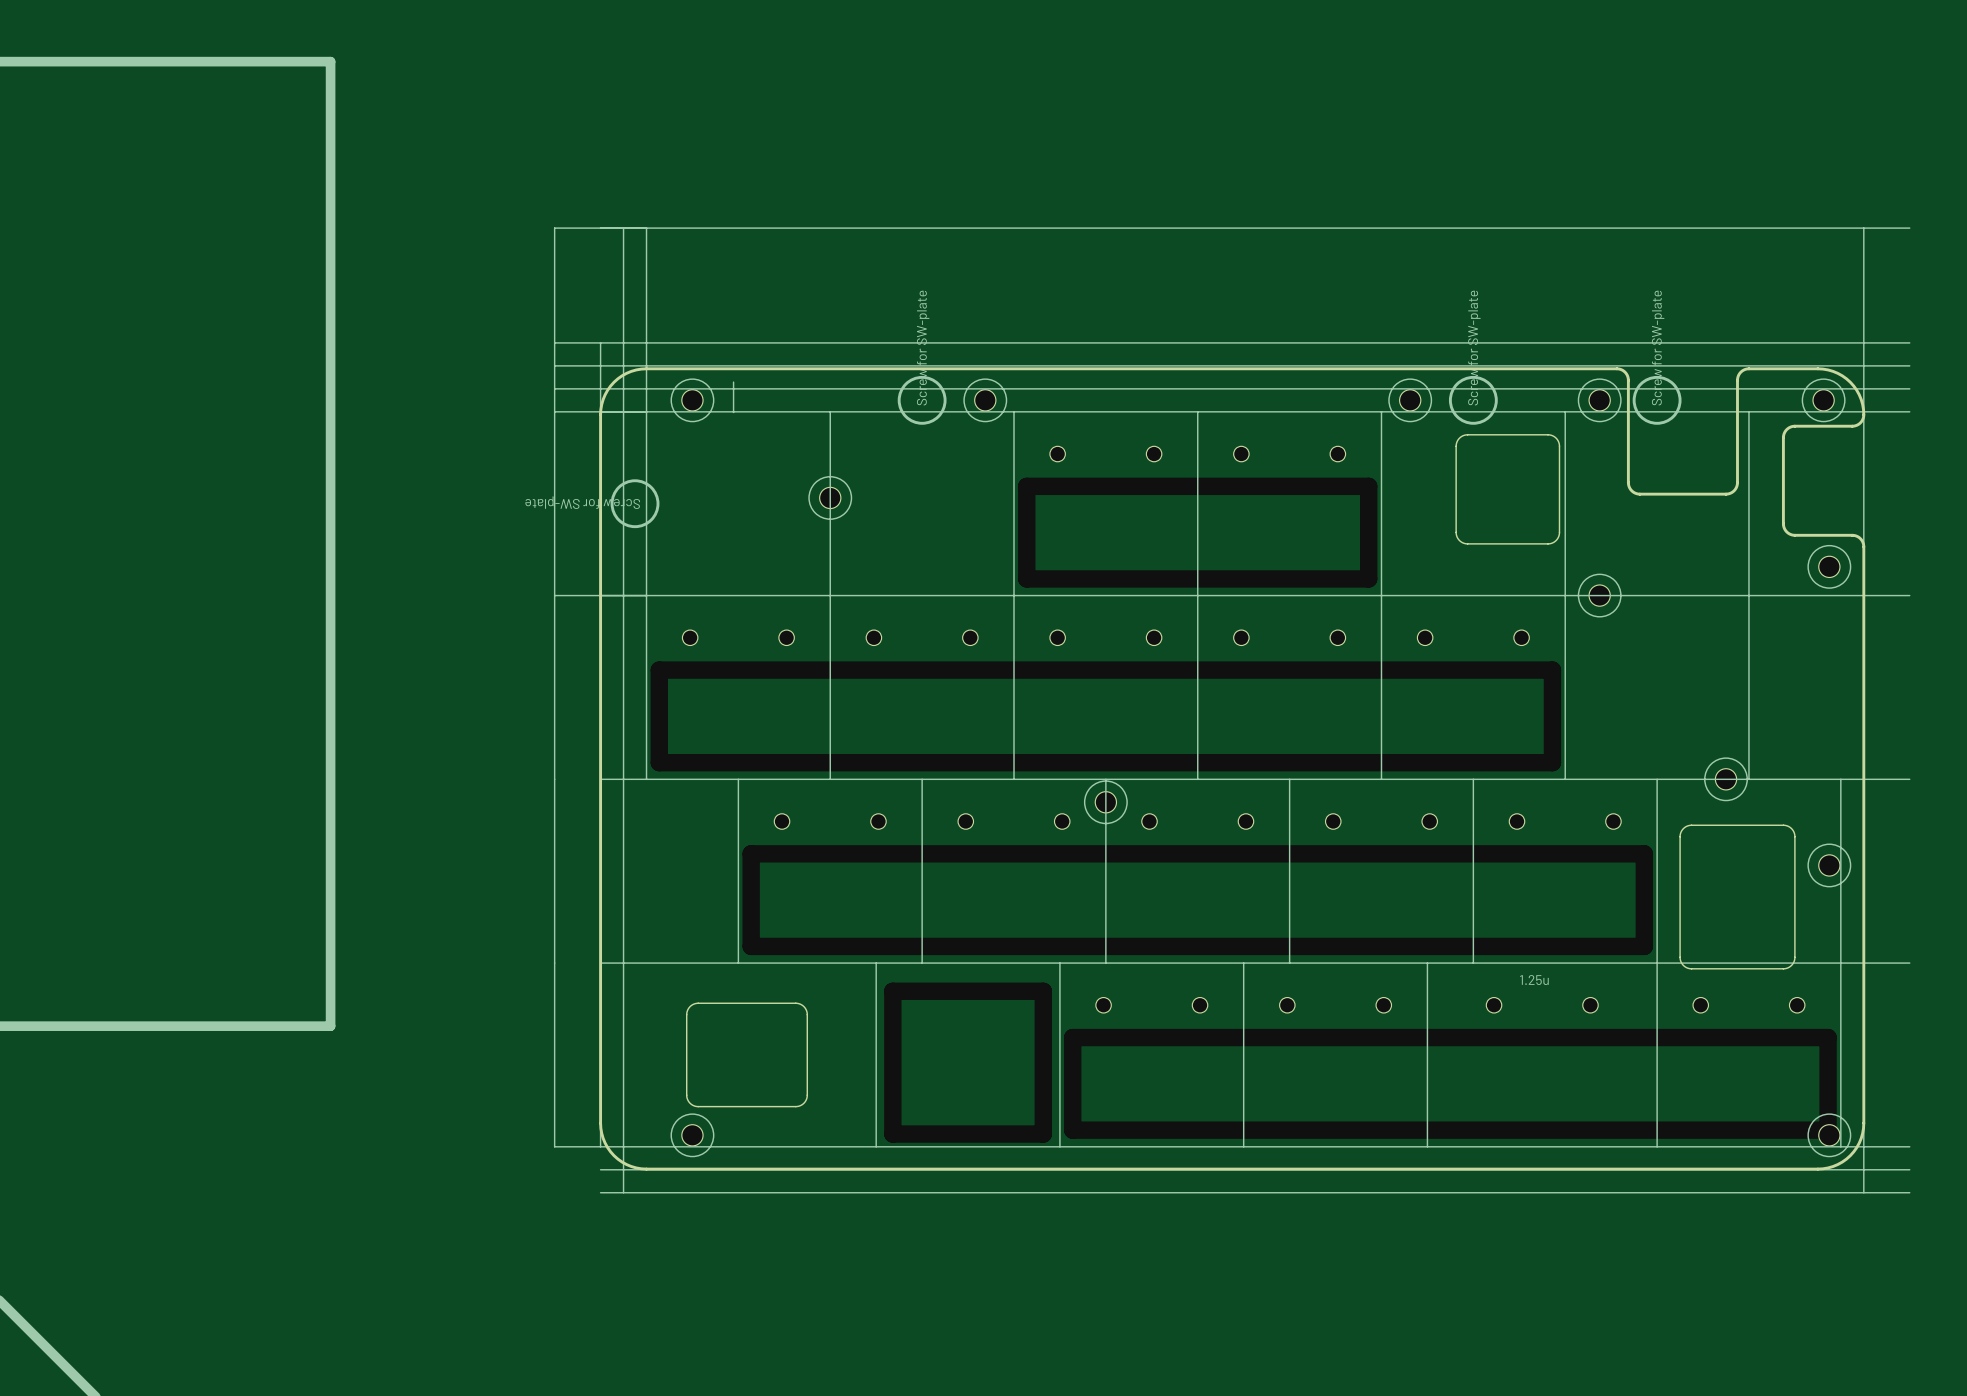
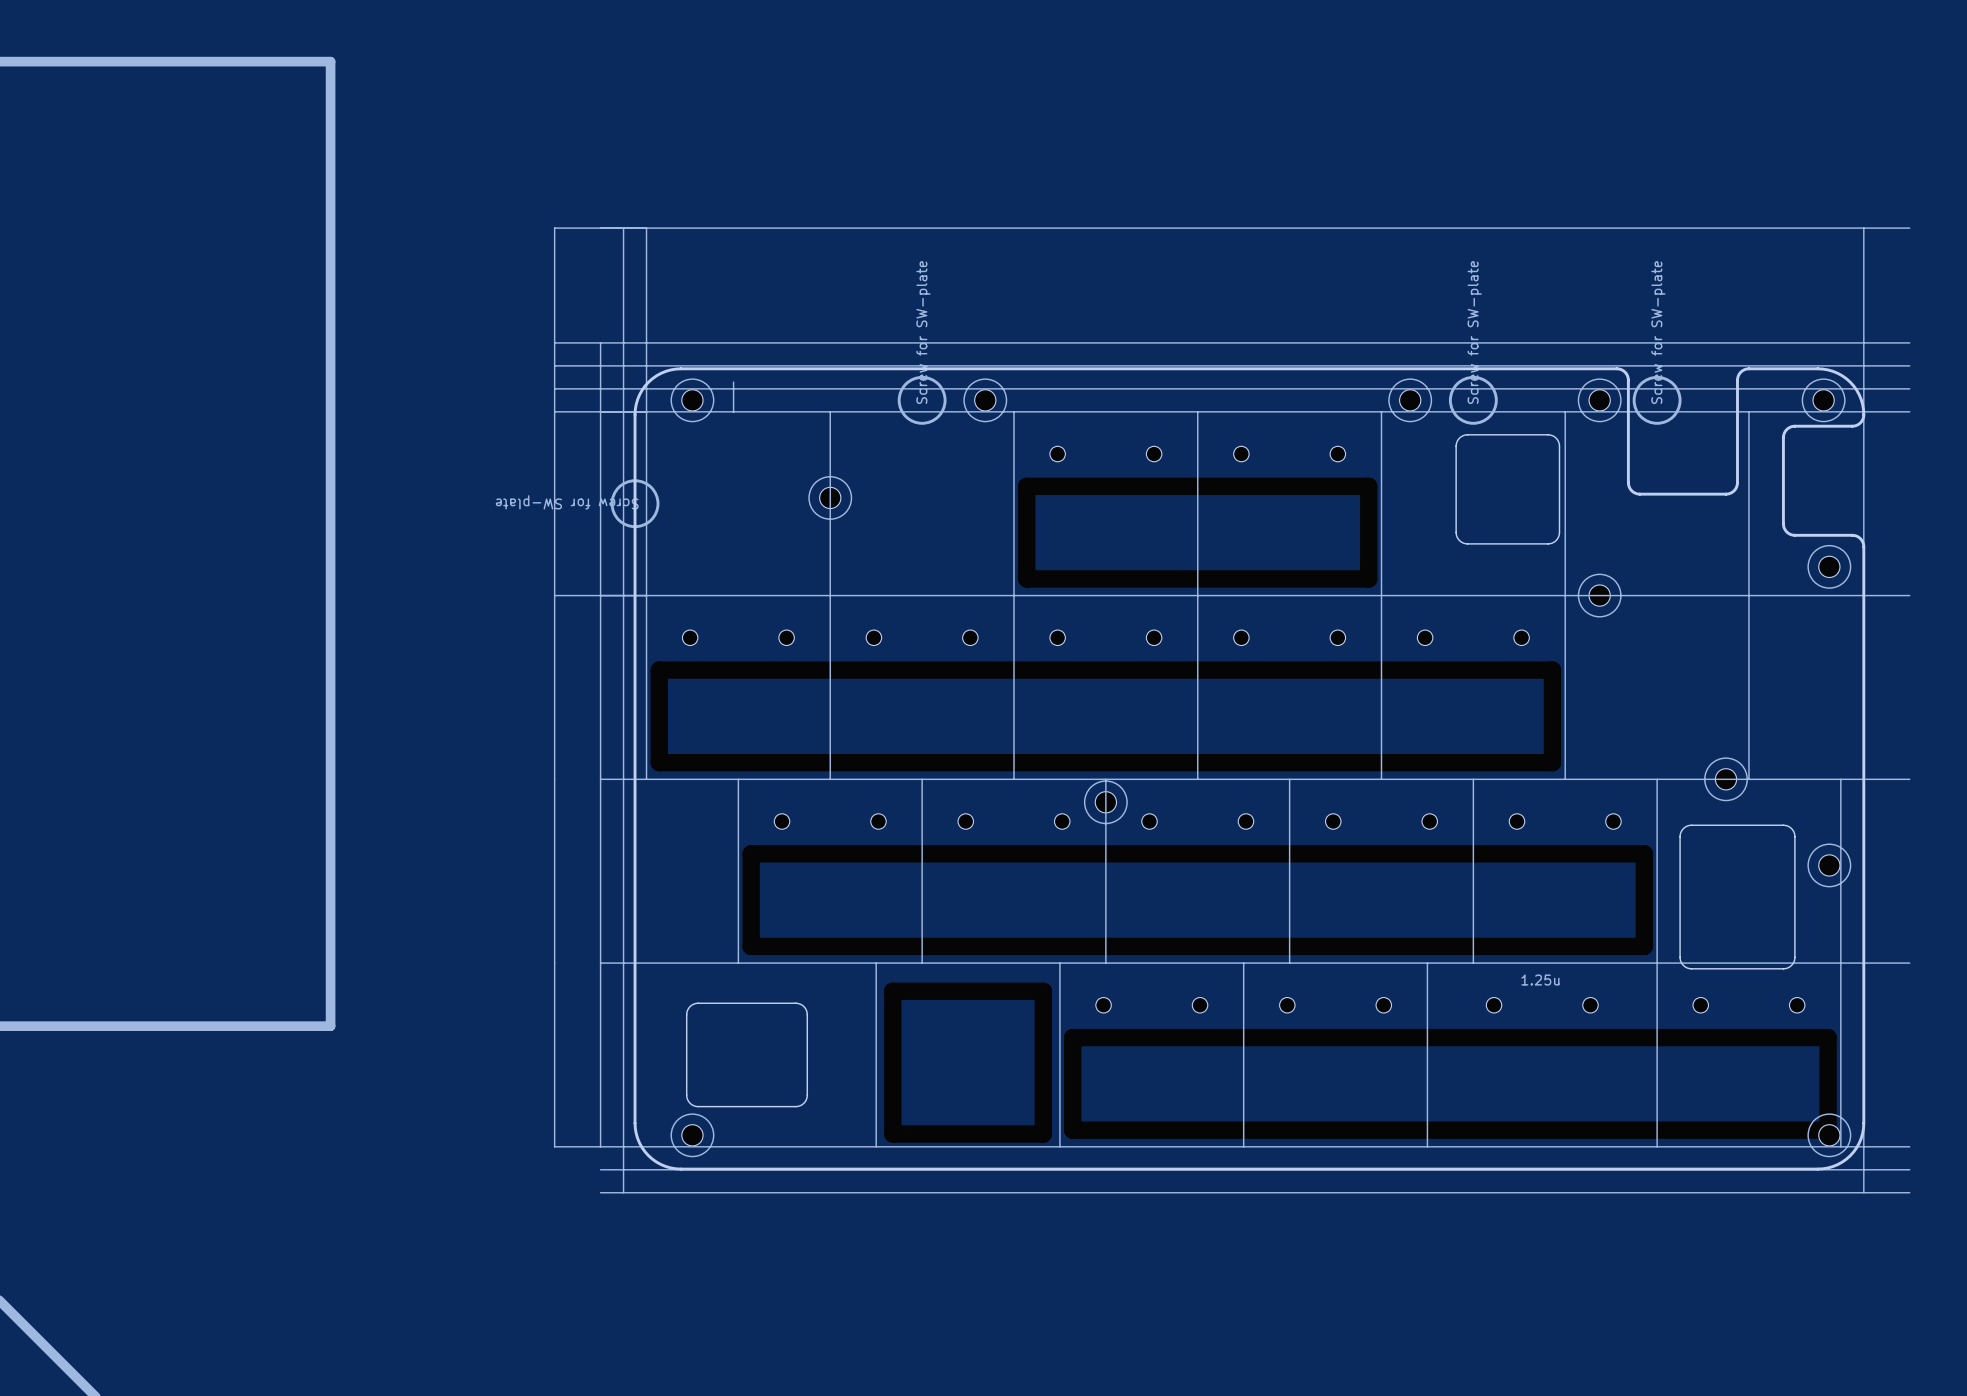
part footprint: [553, 227, 1911, 1194] -> [553, 227, 1911, 1194]

